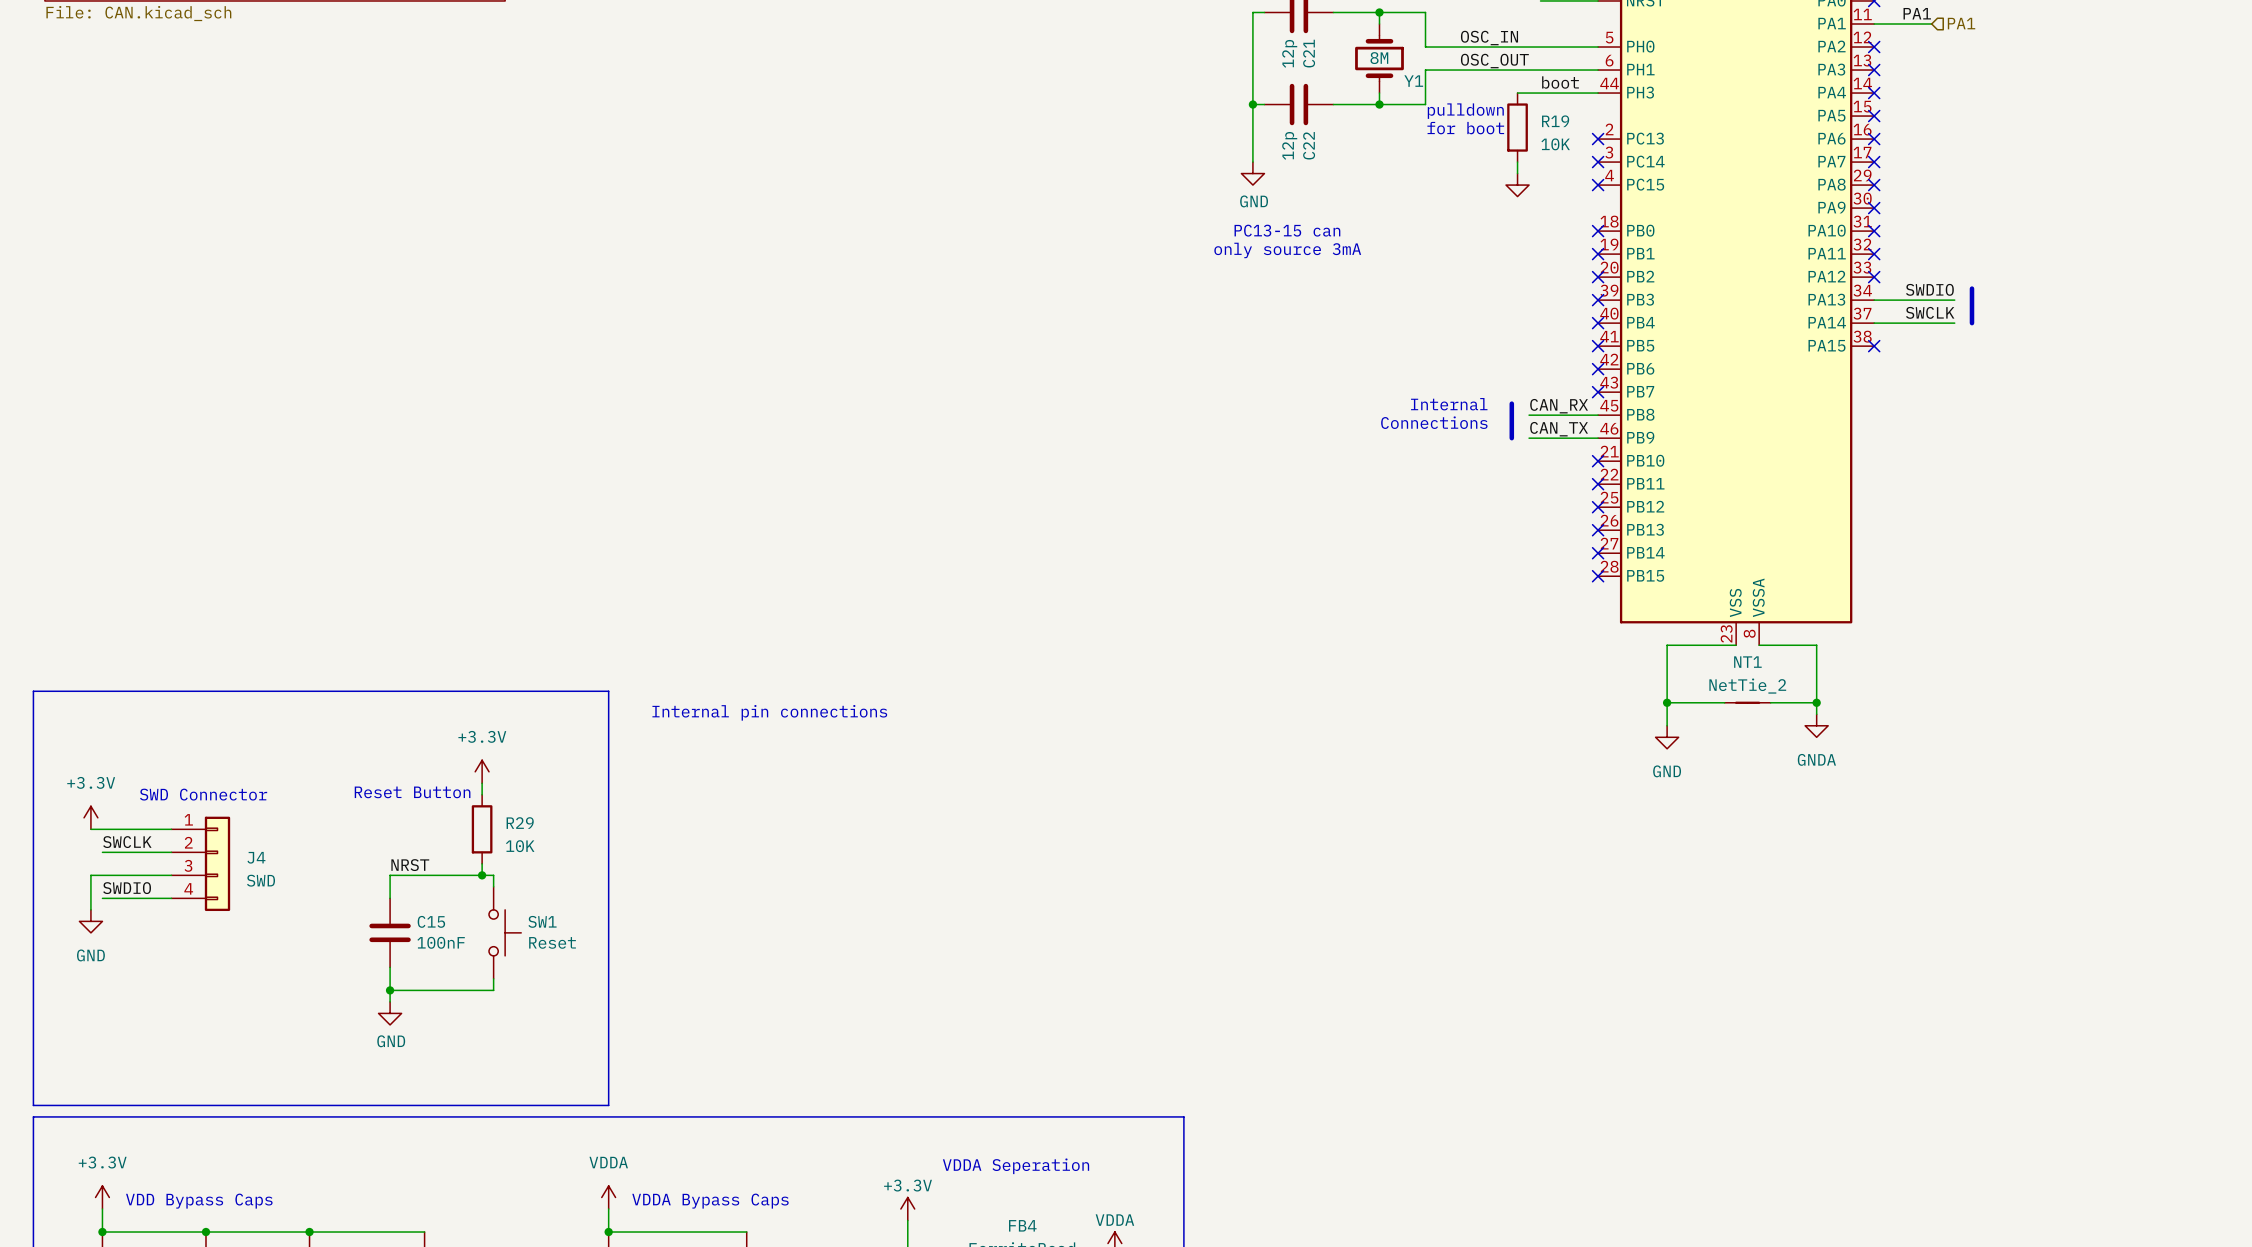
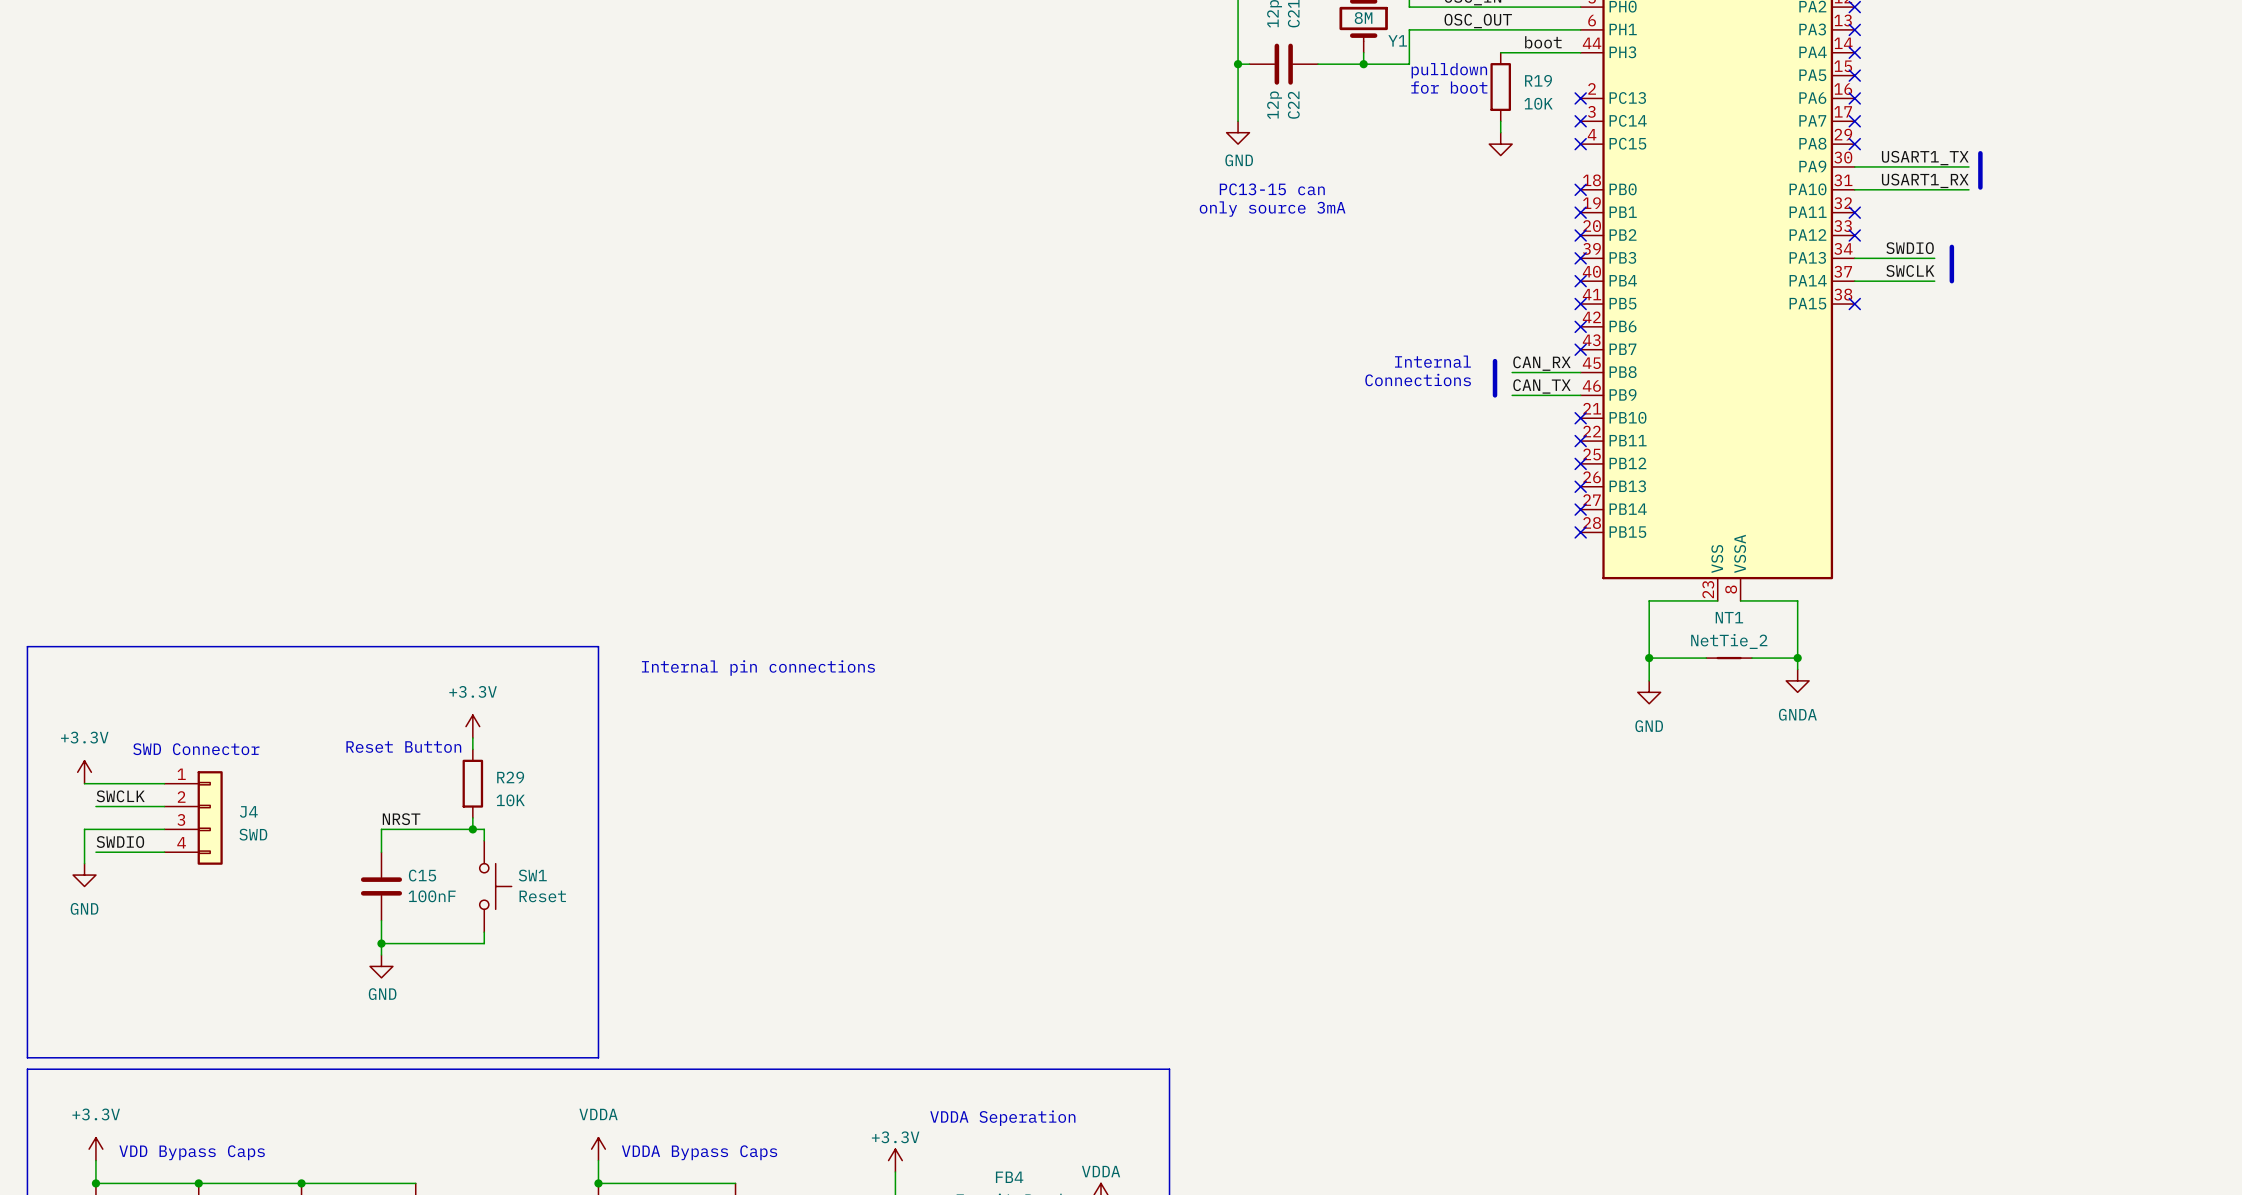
line: none -> (1980, 153) (1980, 187)
label: none -> USART1_TX (1925, 158)
wire: none -> (1854, 166) (1968, 166)
no-connect mark: (1874, 208) -> none
label: none -> USART1_RX (1925, 180)
wire: none -> (1854, 189) (1968, 189)
no-connect mark: (1874, 231) -> none

